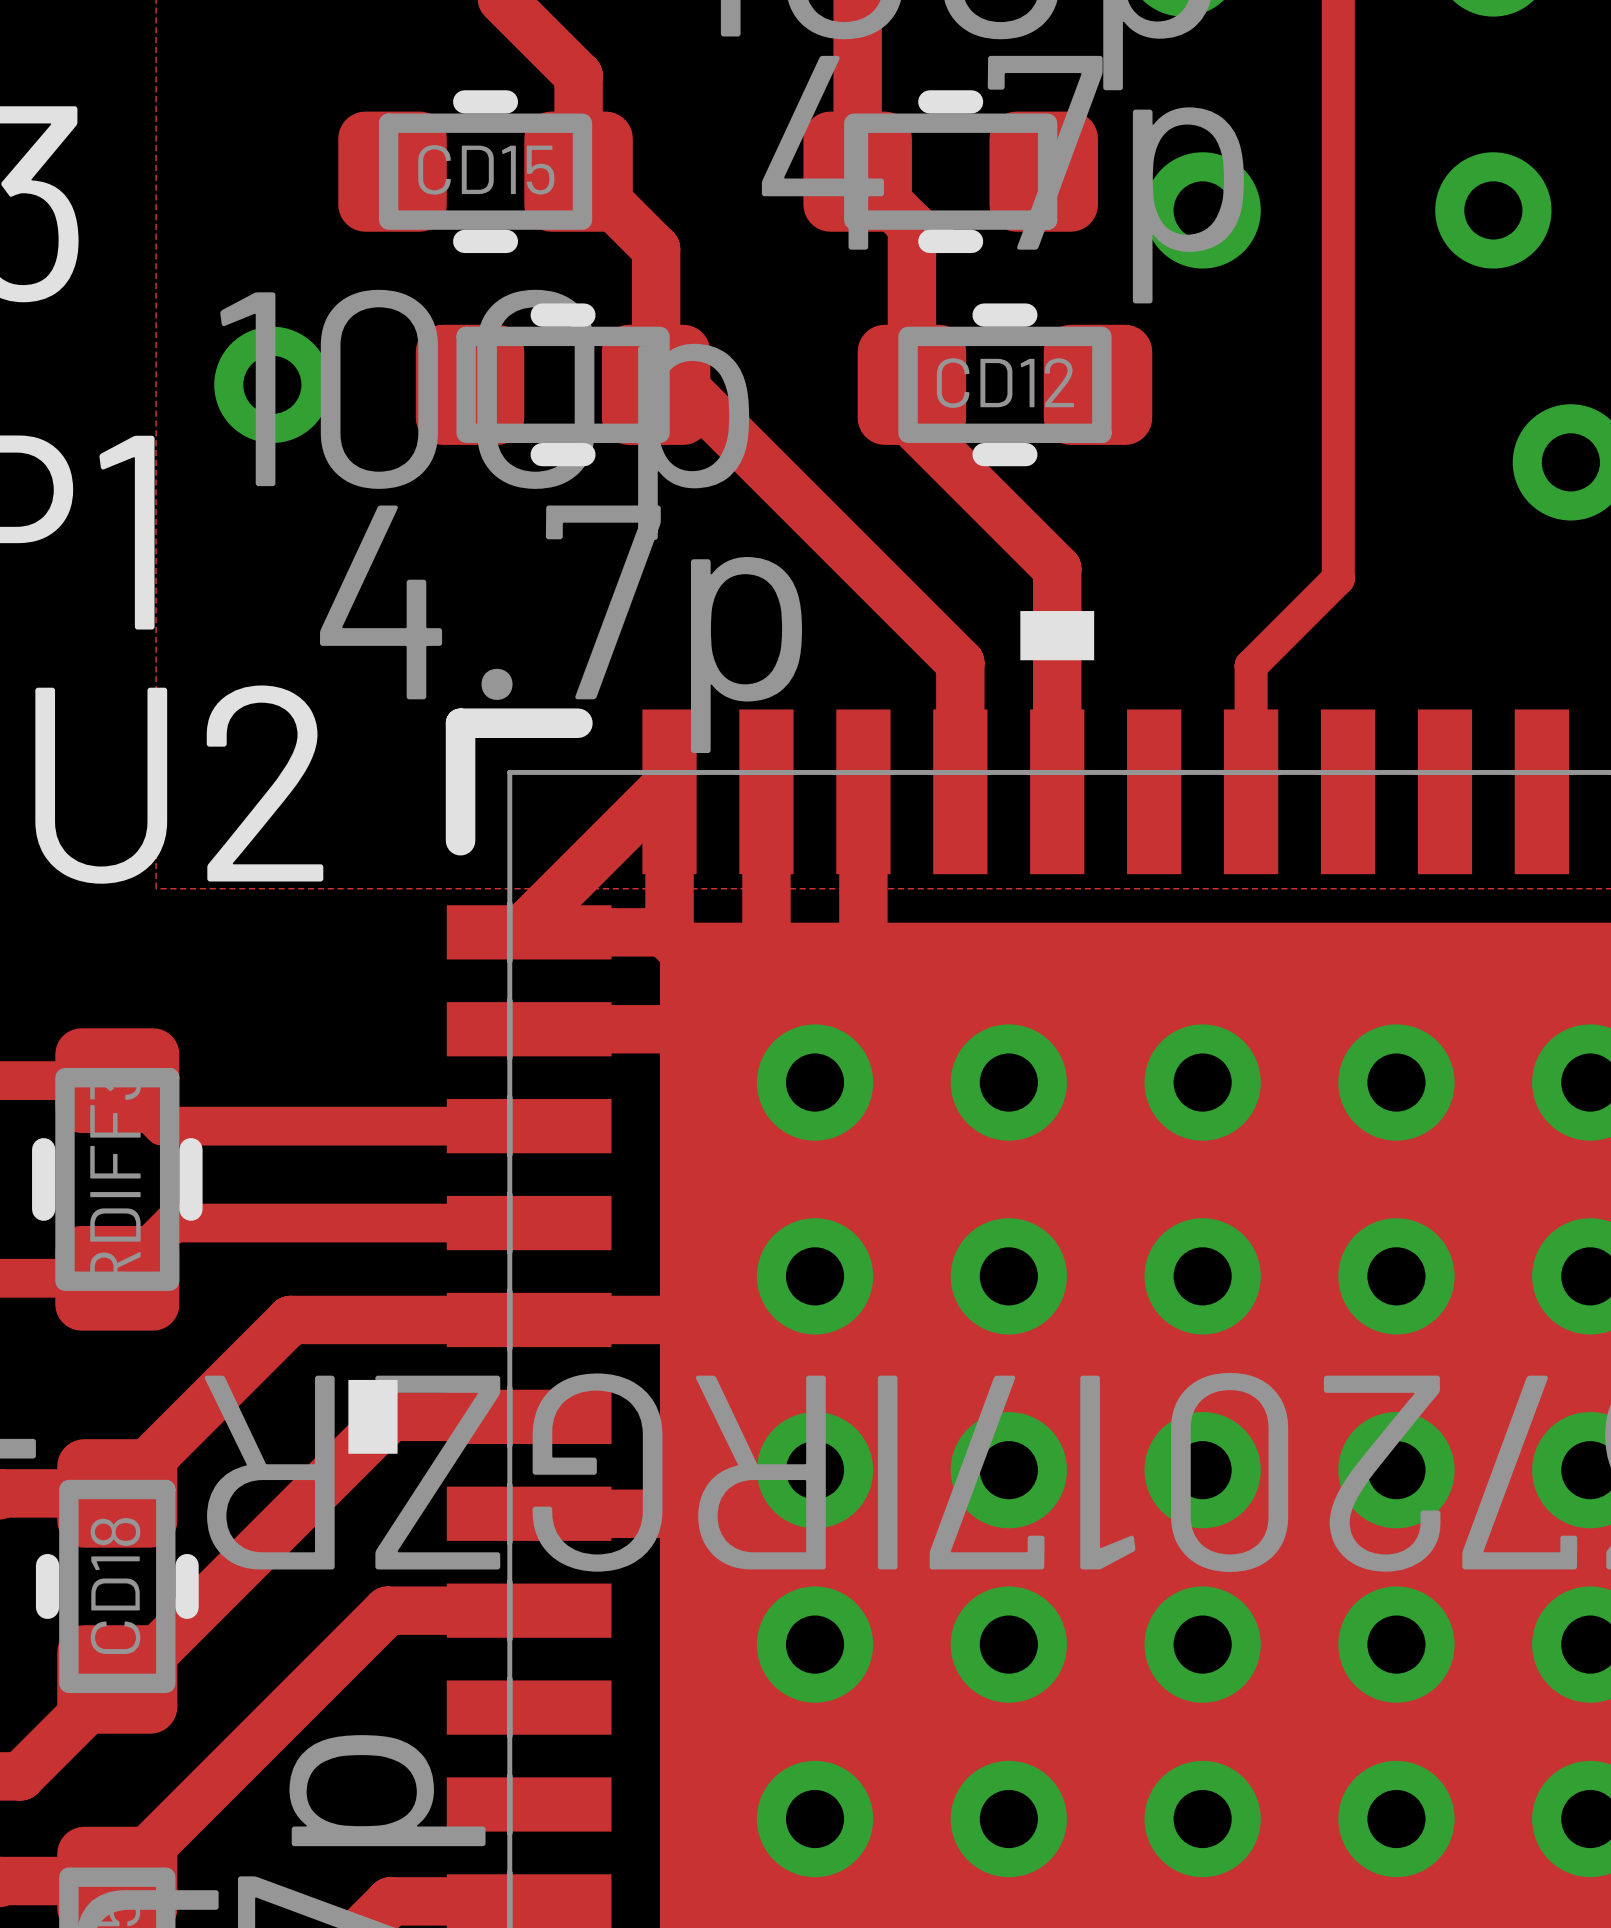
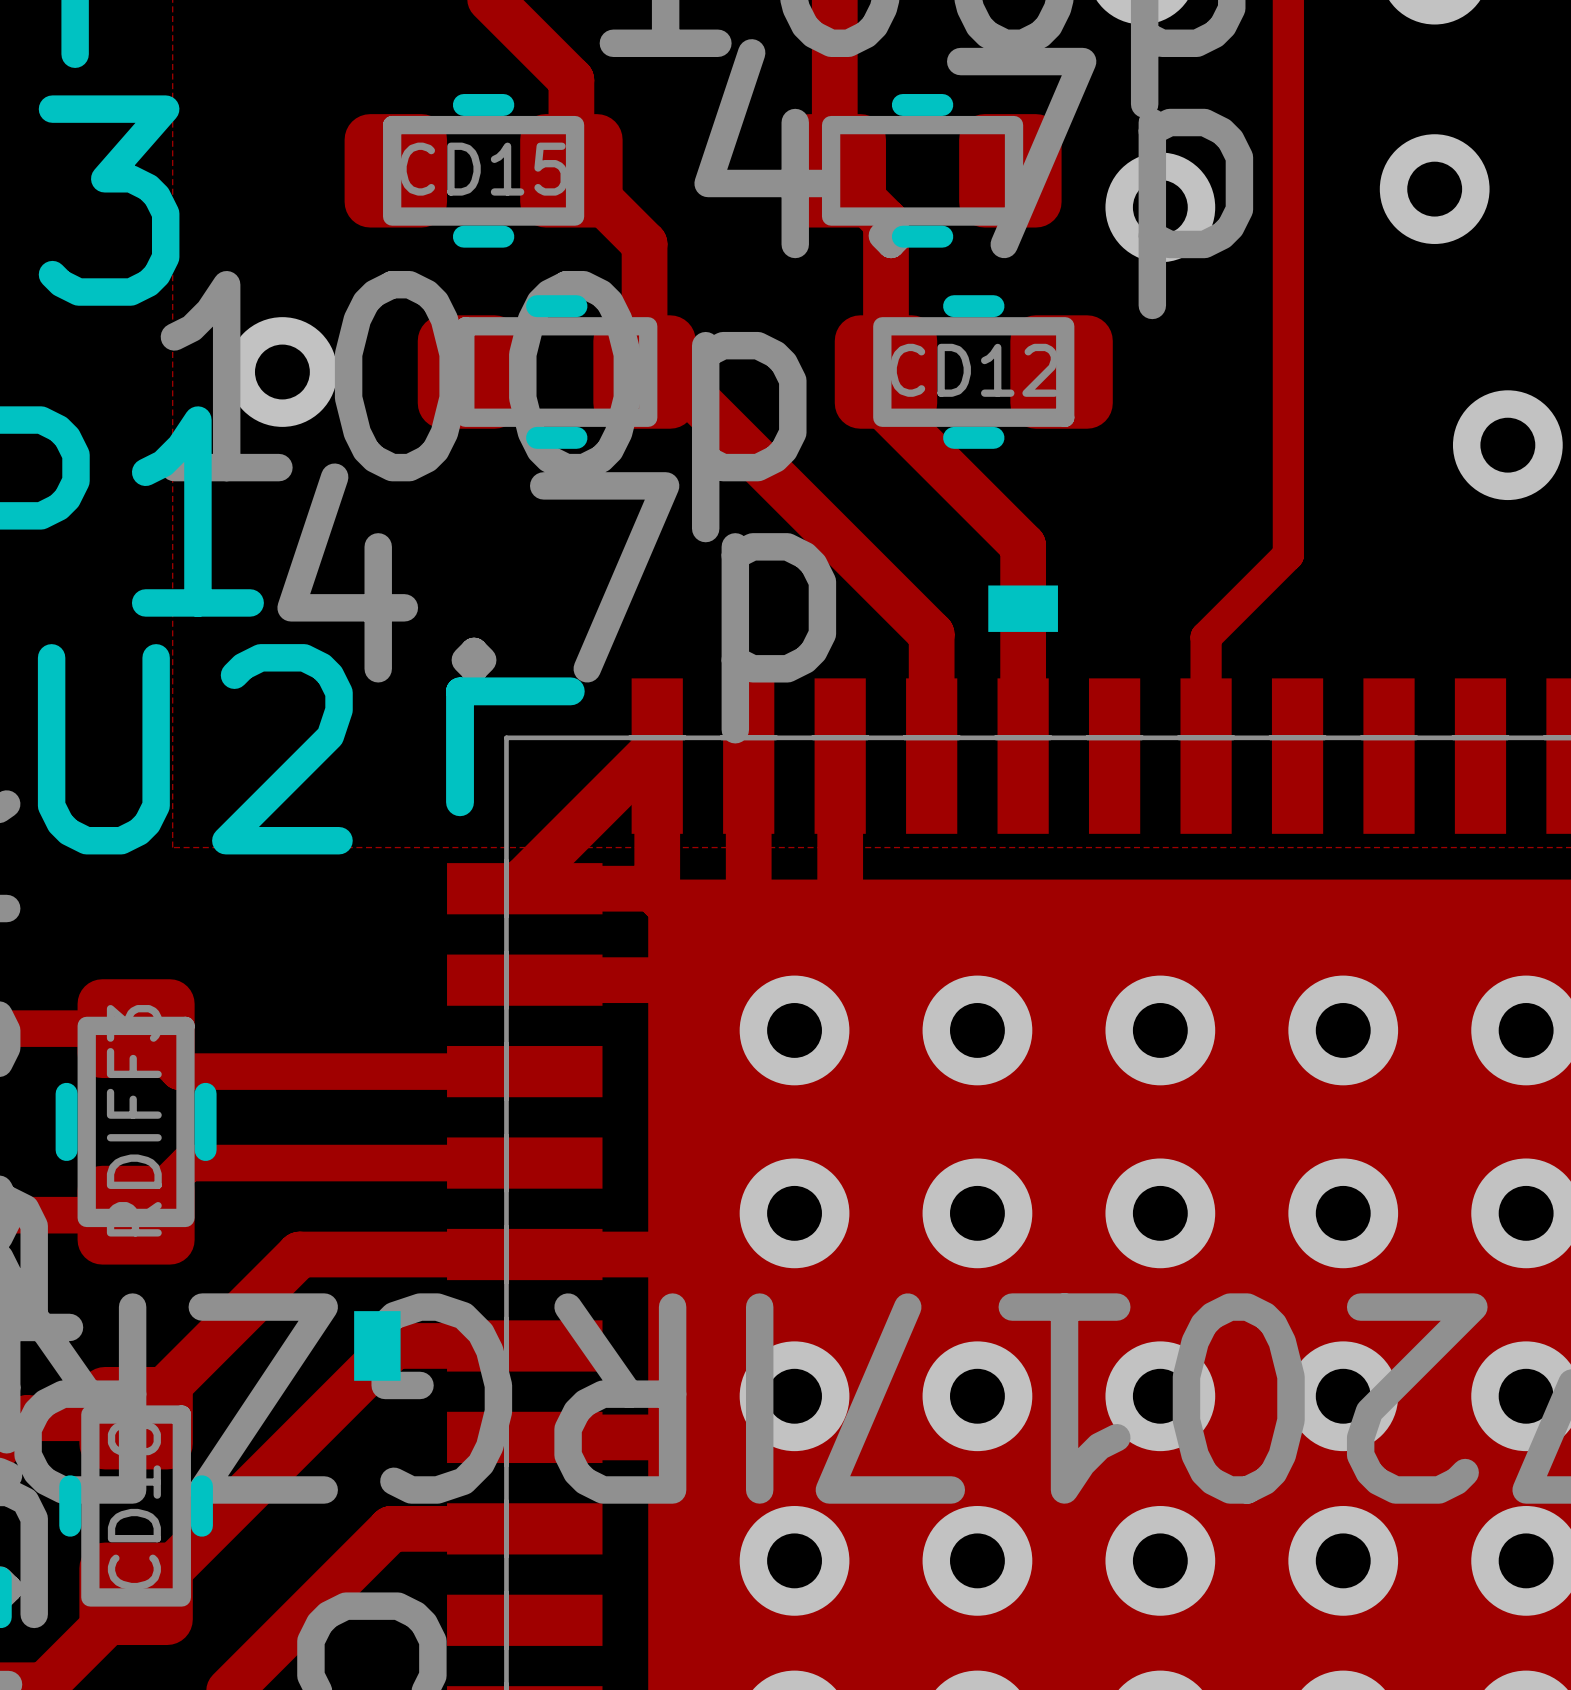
via position: (1493, 210) -> (1434, 189)

